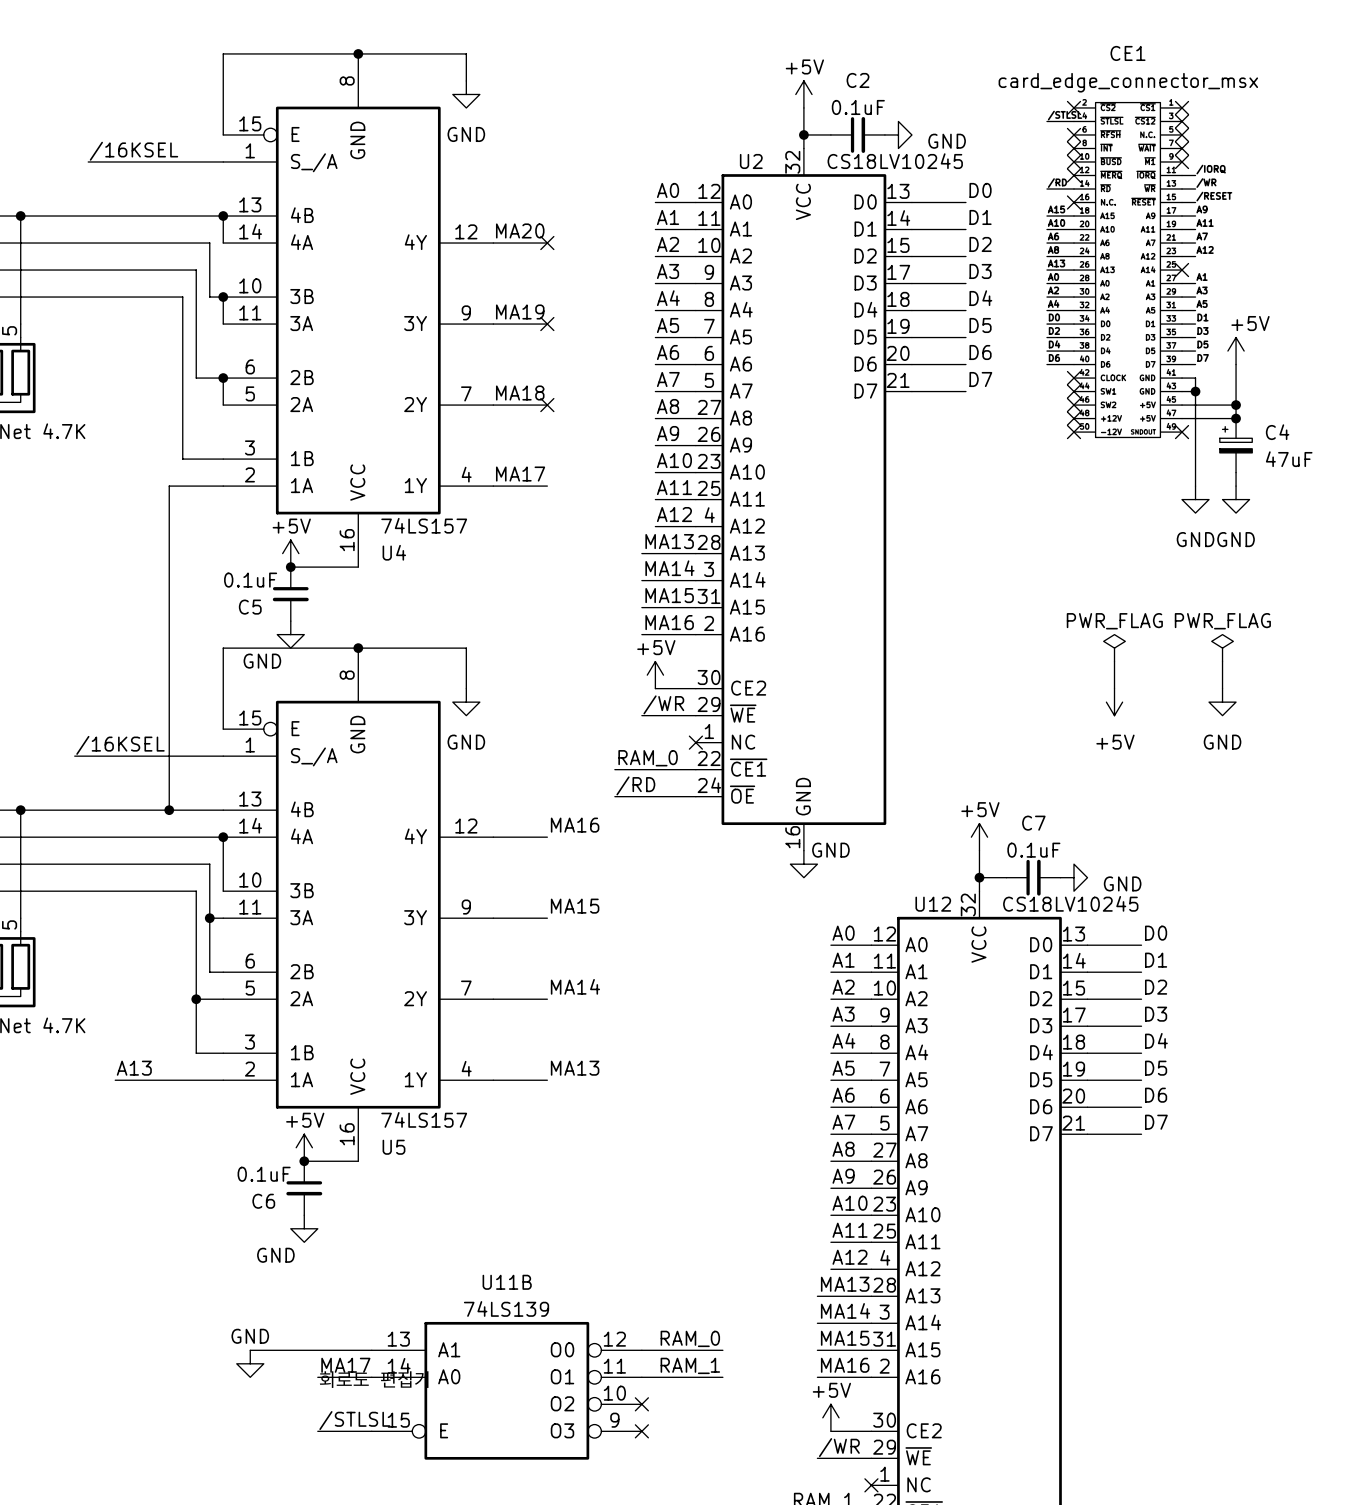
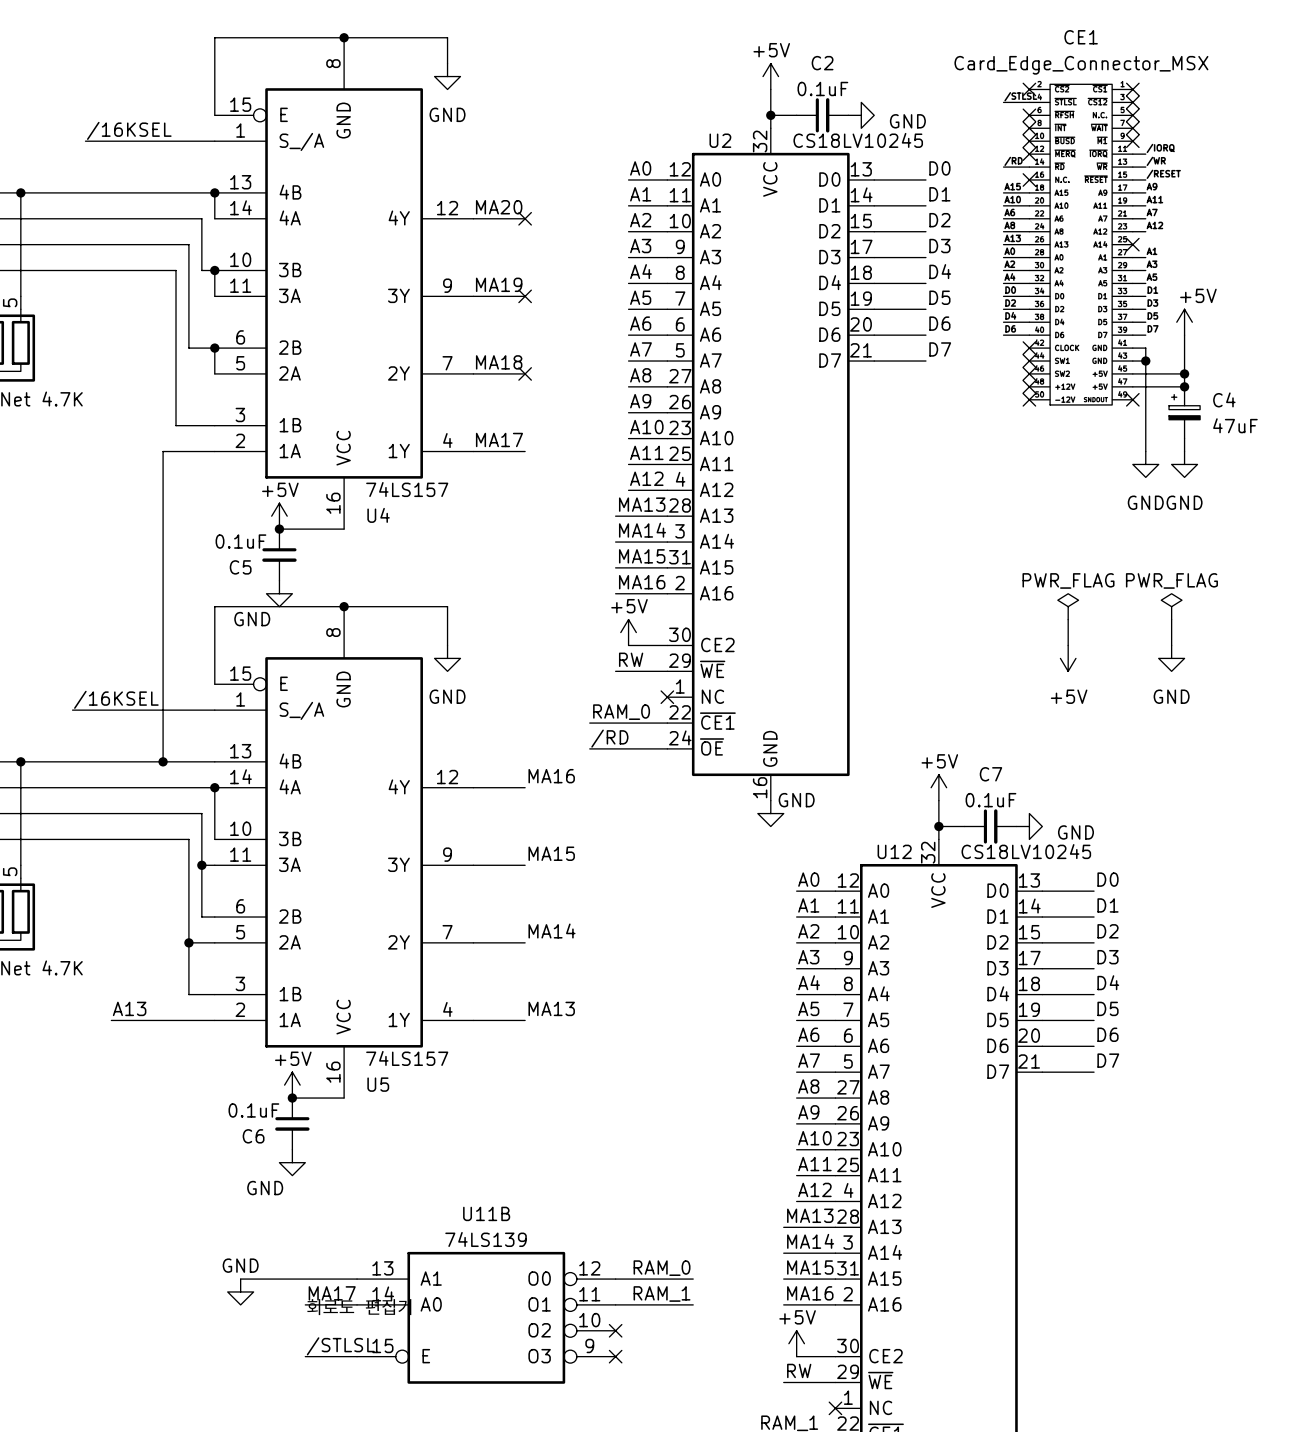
CE1 value: card_edge_connector_msx (1128, 82) -> Card_Edge_Connector_MSX (1081, 65)
label: /WR (663, 704) -> RW (631, 659)
label: /WR (839, 1447) -> RW (799, 1370)

